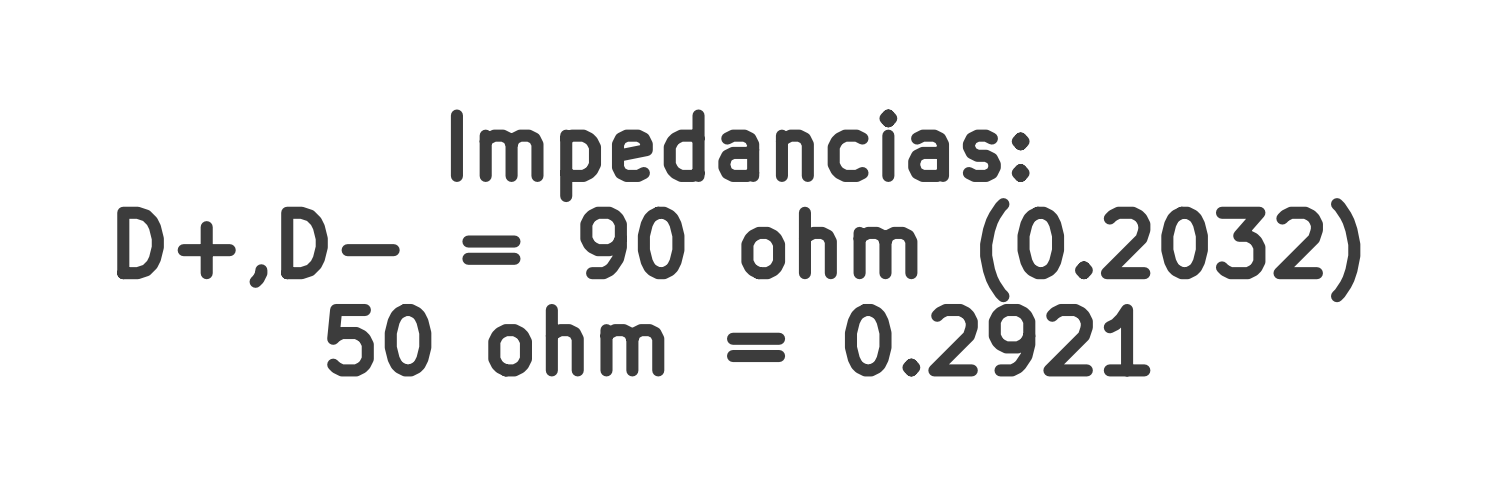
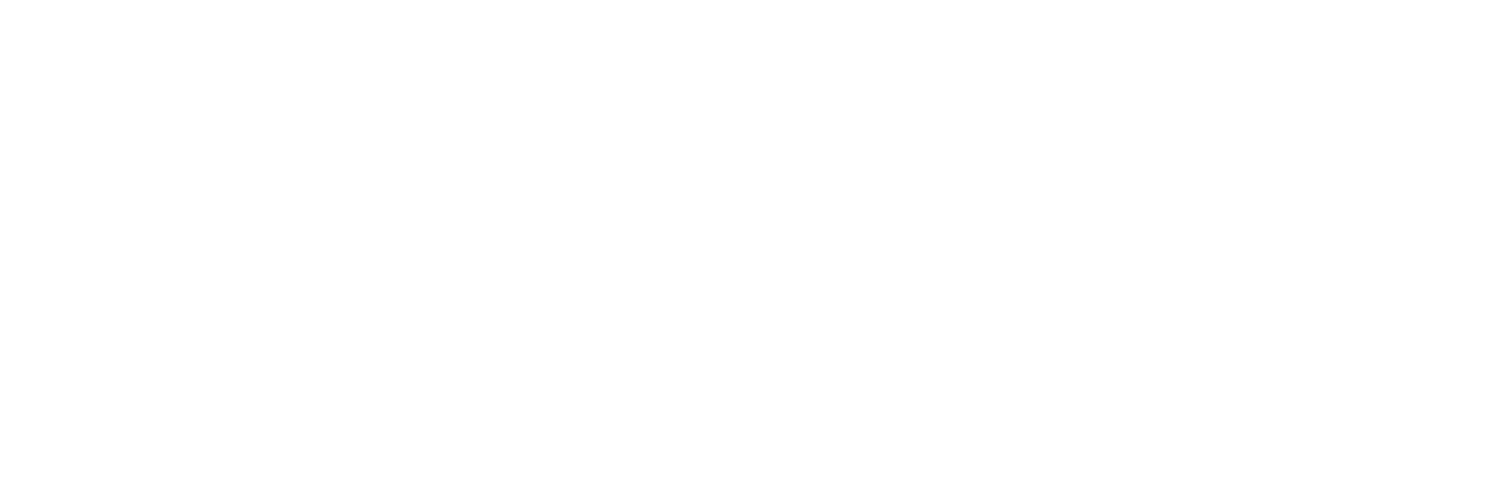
text: Impedancias: (740, 155) -> none
text: D+,D- = 90 ohm (0.2032) (738, 250) -> none
text: 50 ohm = 0.2921 (738, 340) -> none

